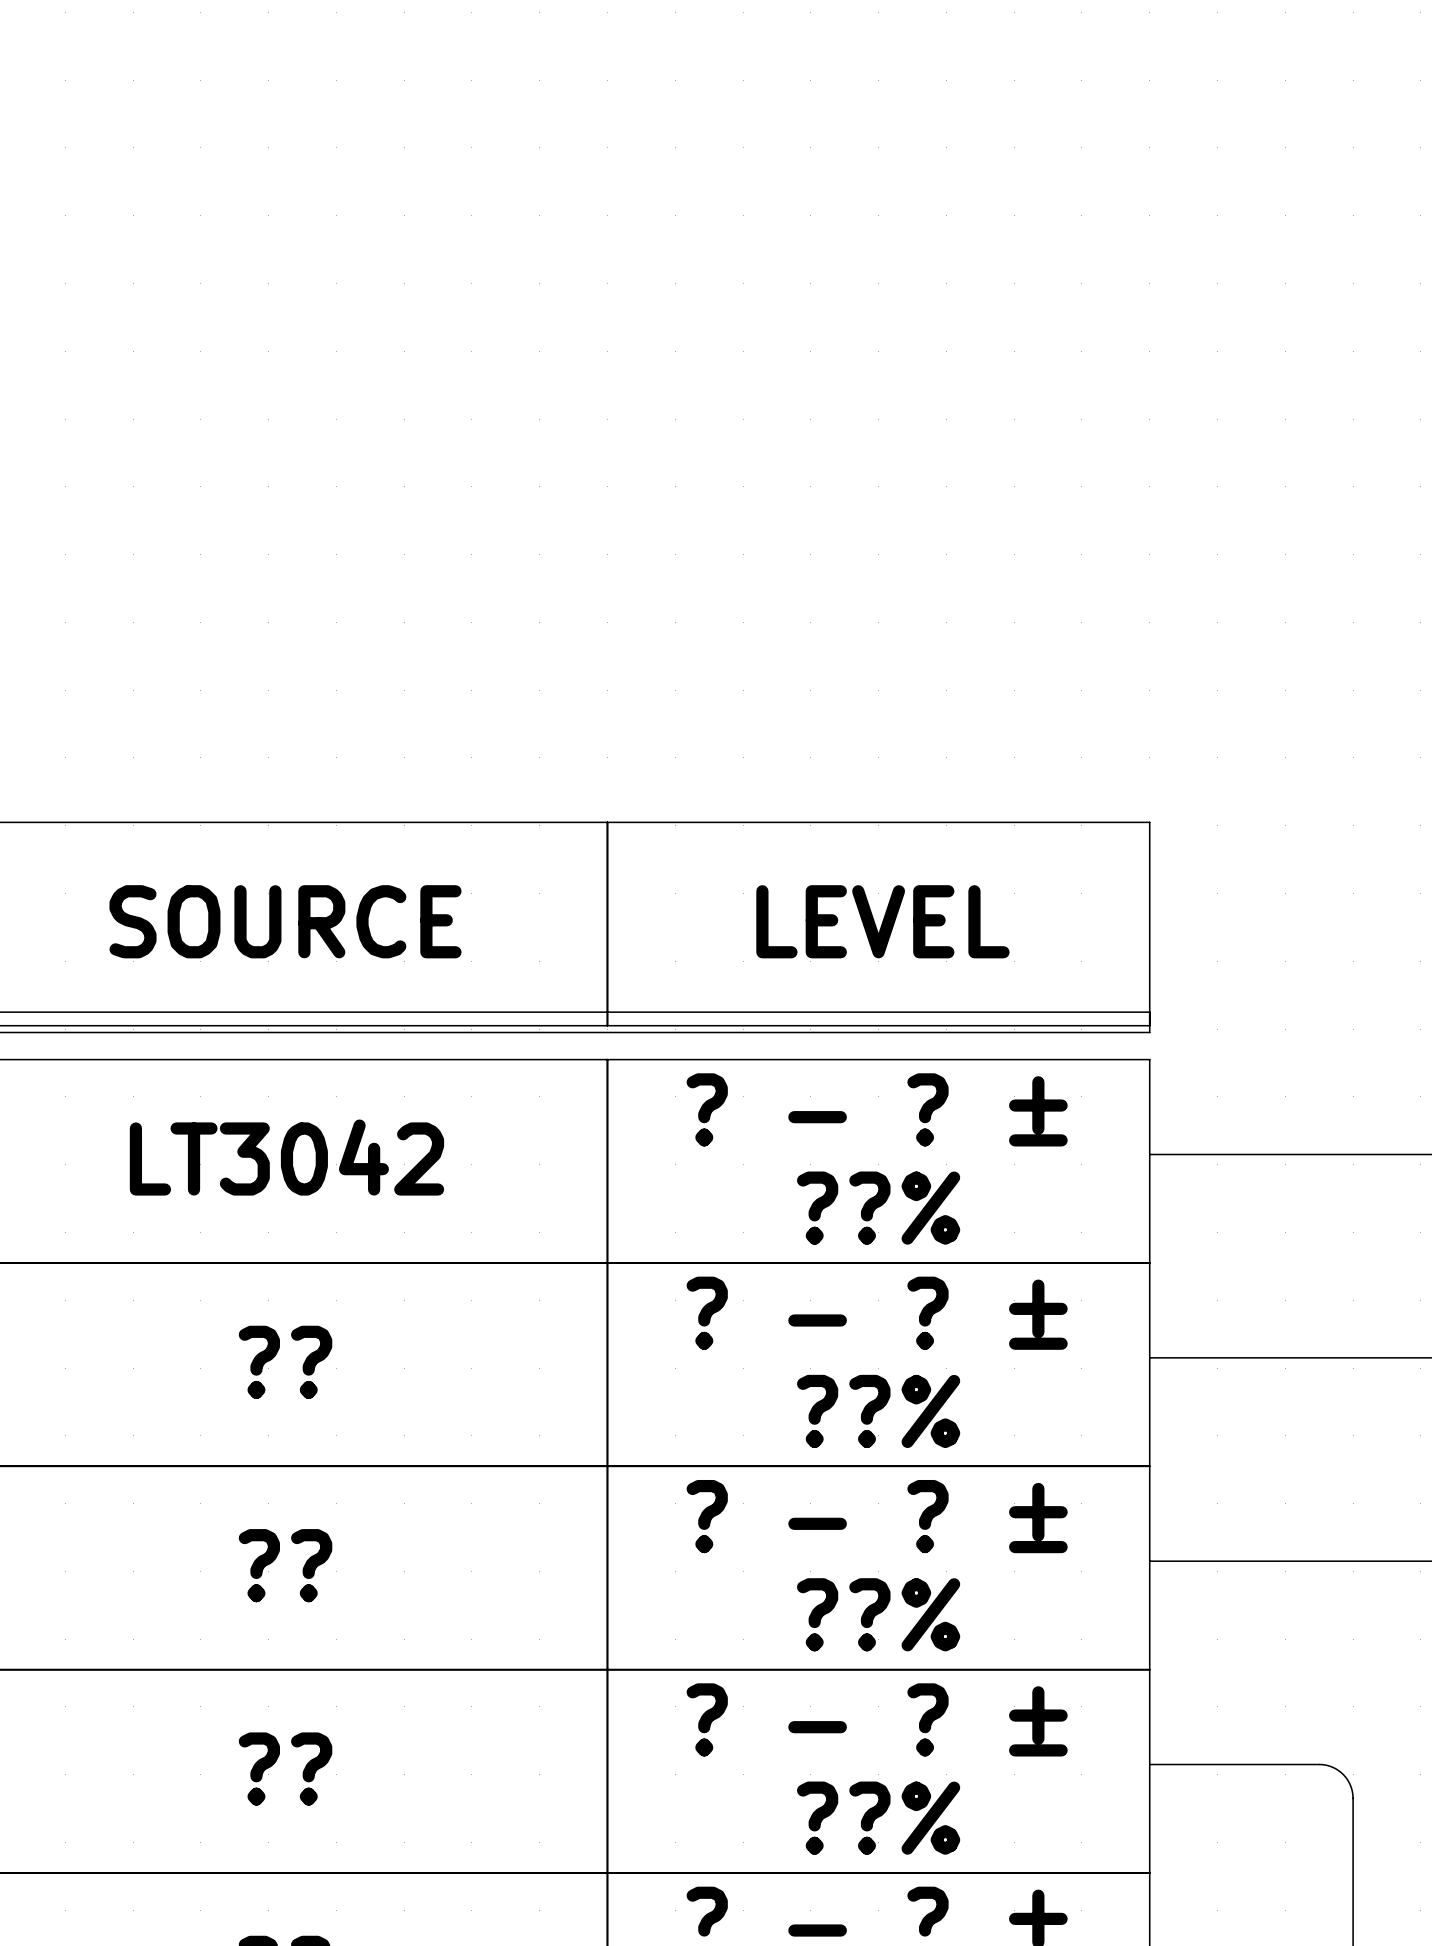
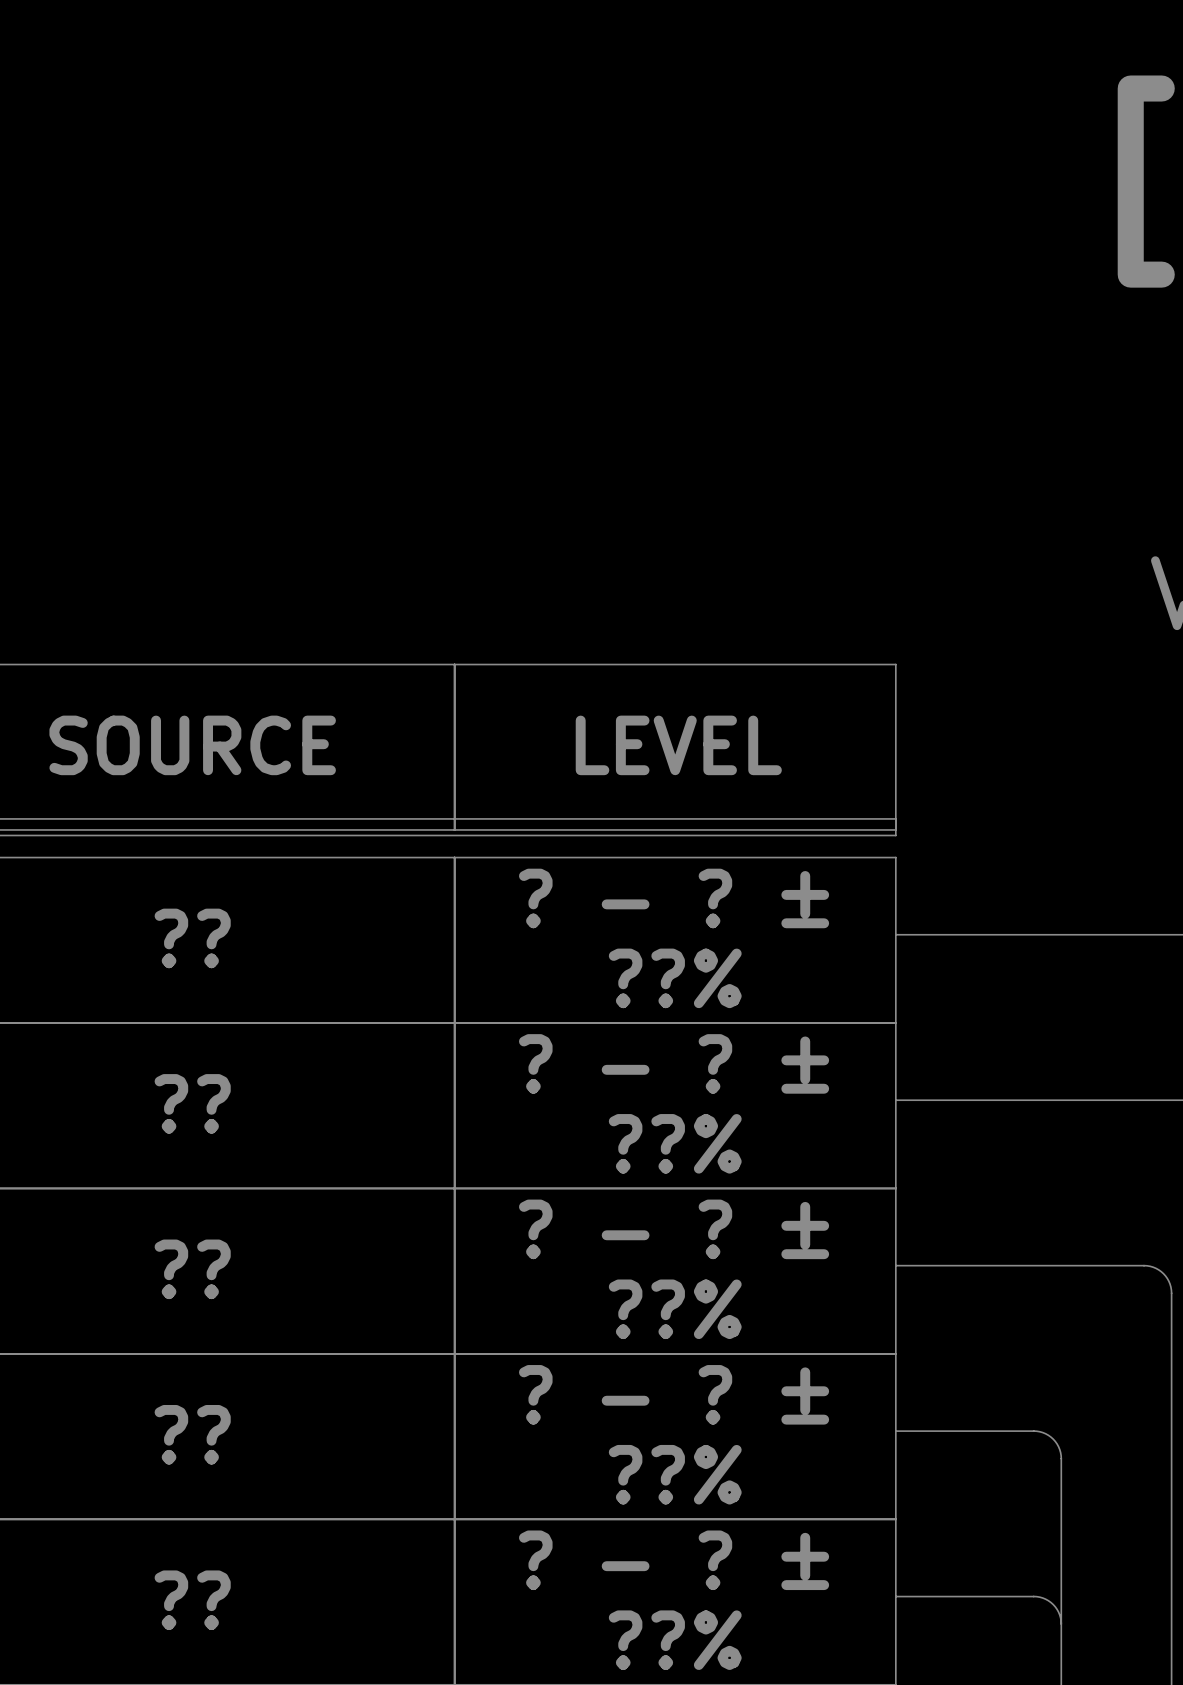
text: LT3042 (286, 1157) -> ?? (192, 938)

